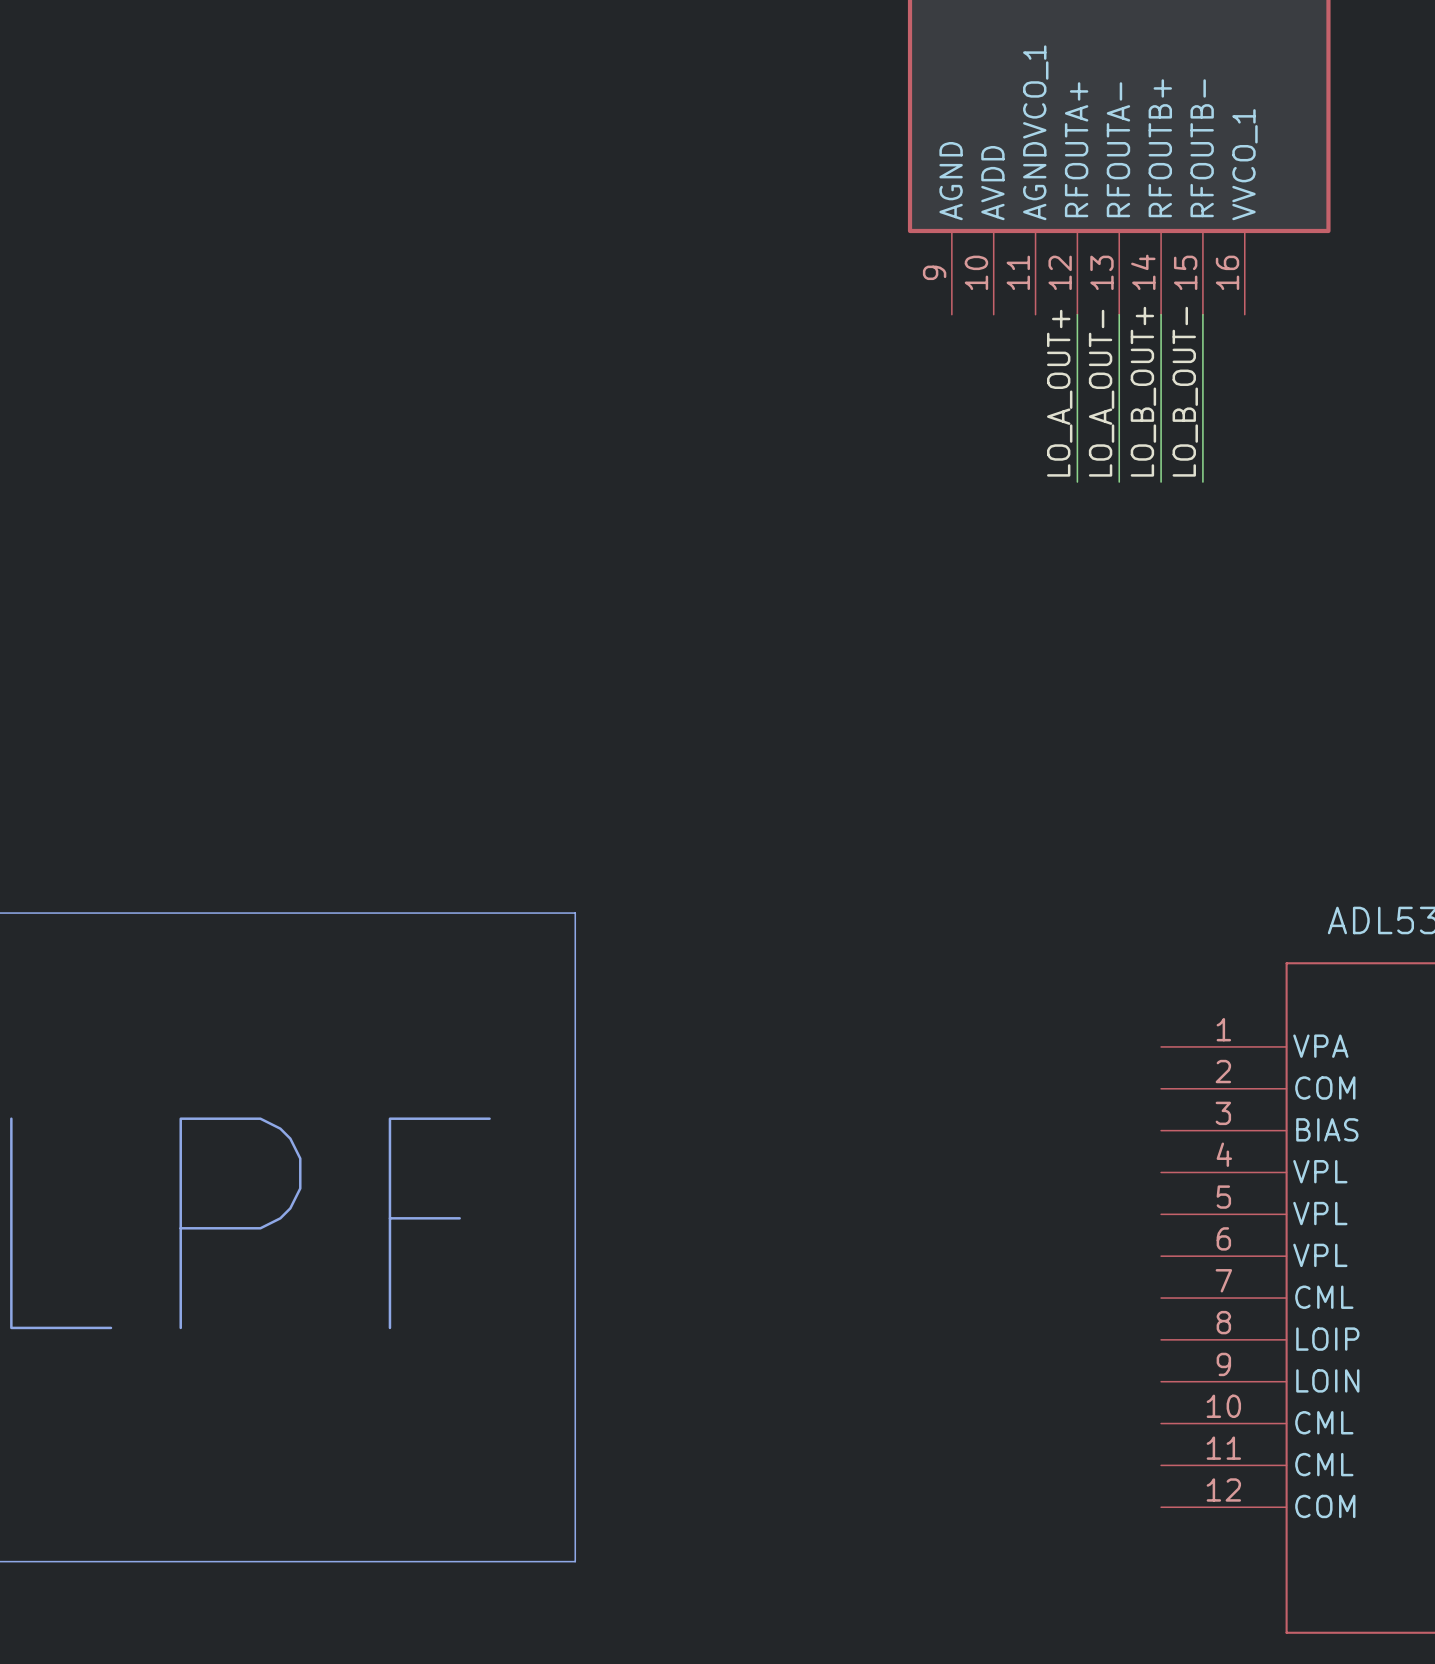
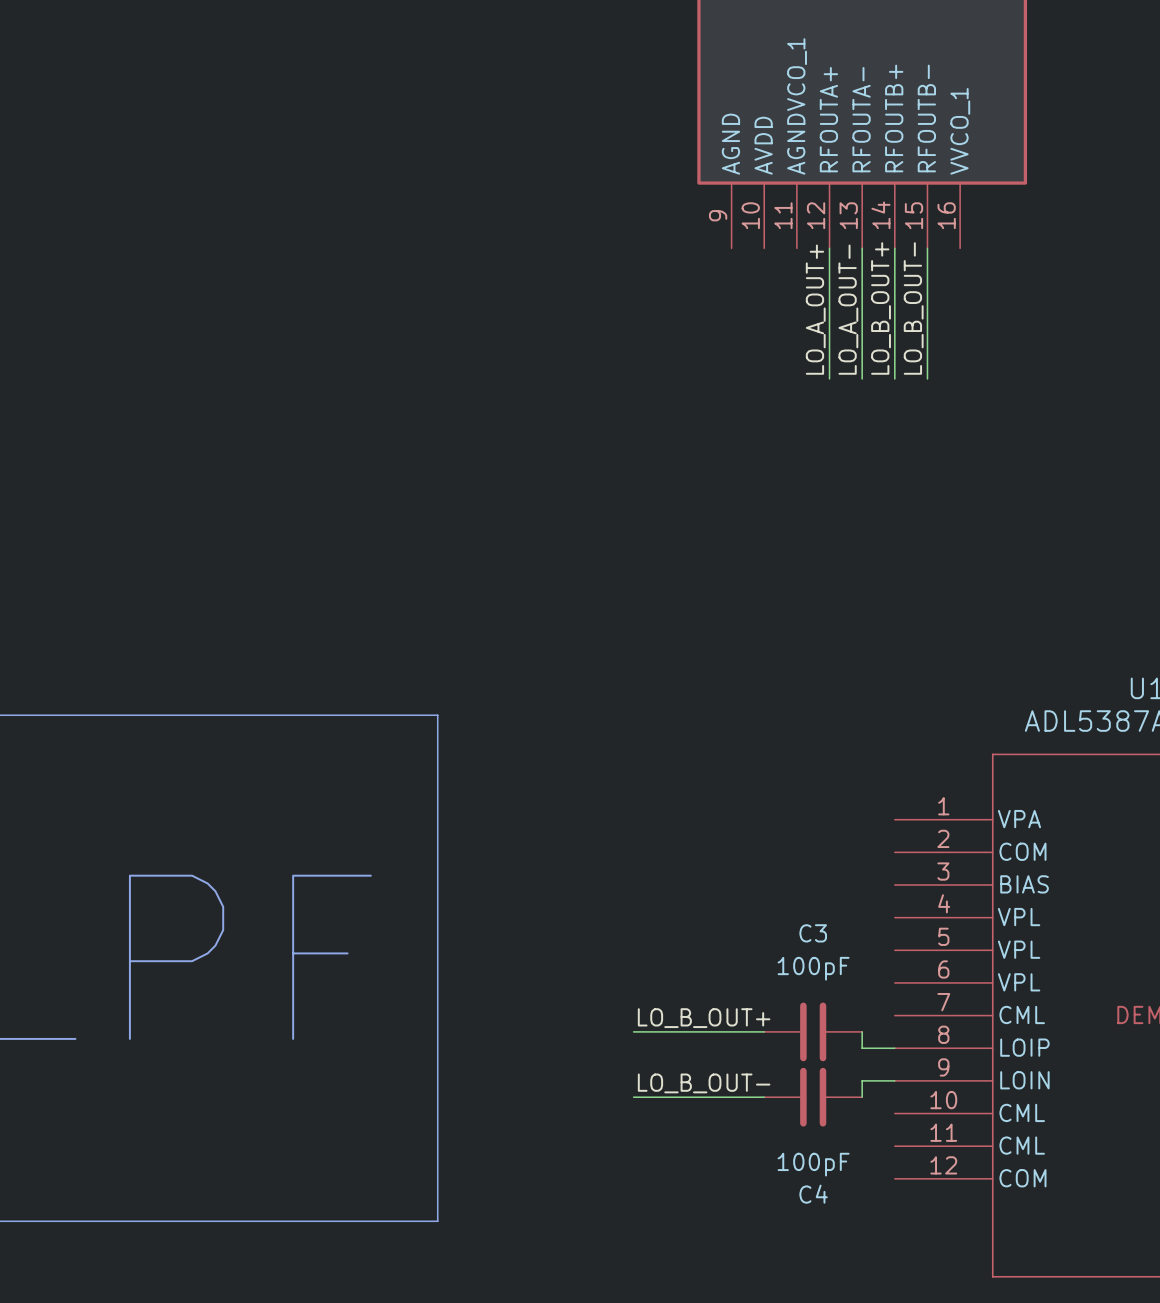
label: none -> LO_B_OUT+ (704, 1018)
wire: none -> (633, 1031) (764, 1031)
C3: none -> 100pF (813, 1031)
wire: none -> (862, 1031) (862, 1048) (894, 1048)
wire: none -> (894, 1080) (862, 1080) (862, 1097)
label: none -> LO_B_OUT- (704, 1083)
wire: none -> (633, 1097) (764, 1097)
C4: none -> 100pF (813, 1097)

